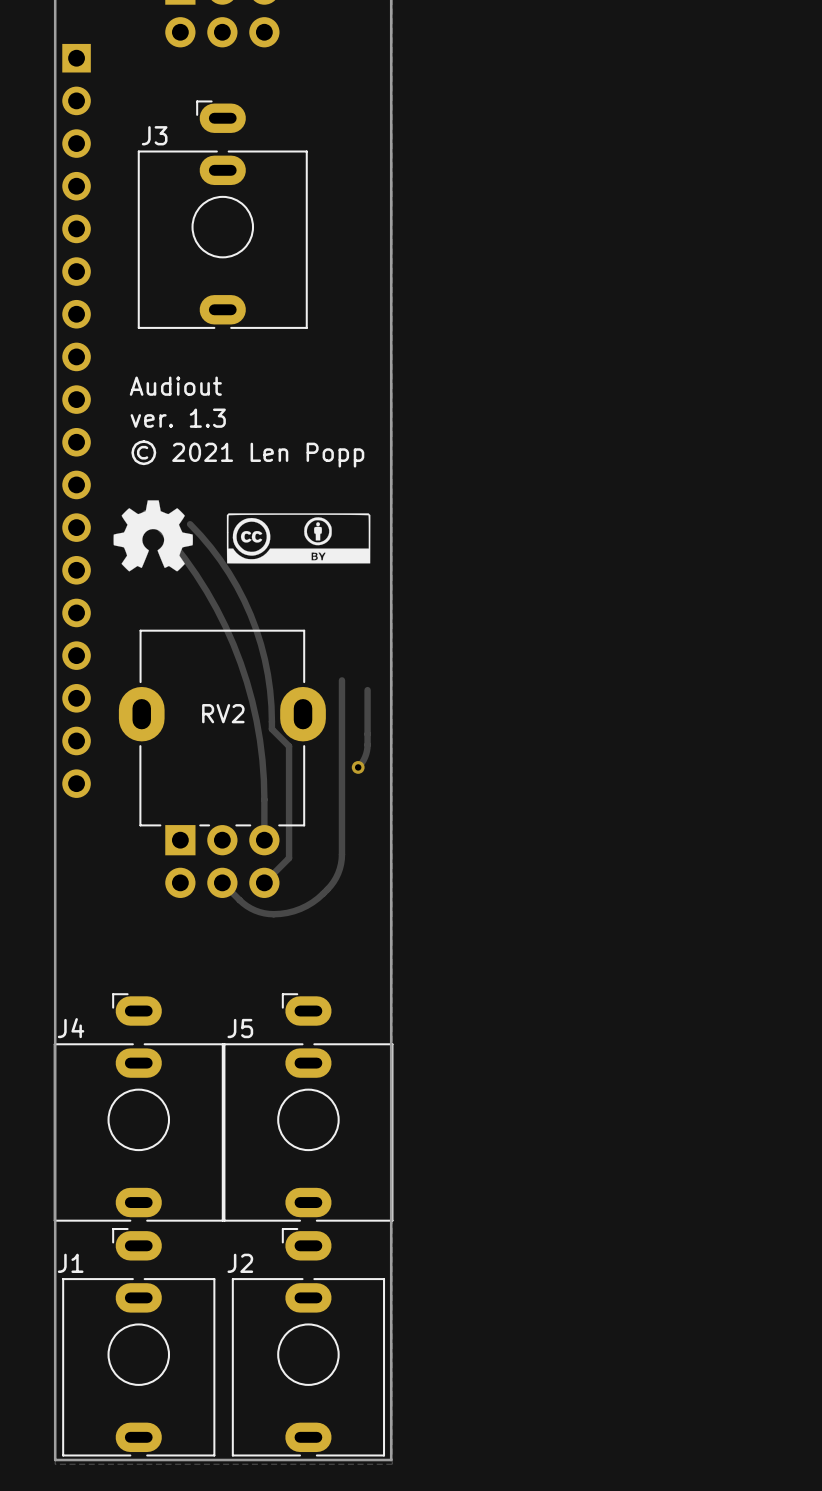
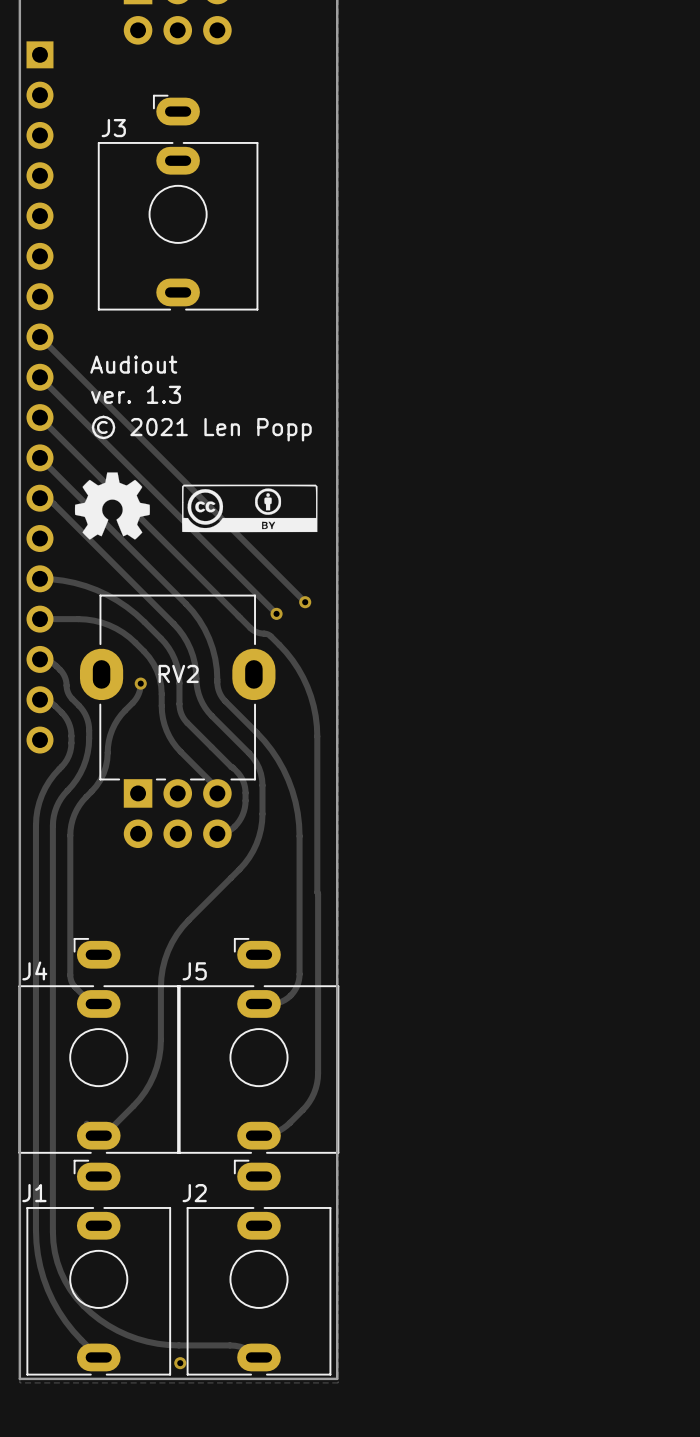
track: none -> (39, 336) (305, 602)
track: none -> (39, 377) (276, 613)
track: none -> (39, 417) (250, 627) (256, 632) (268, 634) (279, 644) (298, 668) (310, 696) (315, 716) (317, 736) (317, 1078) (314, 1093) (309, 1102) (289, 1122) (275, 1132) (259, 1135)
track: none -> (39, 457) (192, 611) (204, 629) (212, 648) (220, 694) (264, 741) (277, 759) (288, 780) (295, 801) (299, 824) (299, 977) (294, 990) (284, 1000) (274, 1003) (259, 1003)
track: (145, 513) (172, 542) (196, 574) (216, 608) (240, 663) (252, 701) (259, 740) (263, 779) (264, 840) -> (39, 619) (94, 620) (116, 628) (135, 642) (149, 657) (157, 671) (161, 686) (162, 718) (169, 736) (180, 751) (214, 786) (217, 793)
track: (190, 524) (220, 560) (237, 586) (250, 614) (260, 644) (267, 674) (271, 729) (289, 746) (289, 858) (264, 882) -> (236, 771) (244, 786) (243, 811) (233, 828) (217, 833)
track: none -> (39, 498) (53, 503) (178, 629) (193, 656) (197, 688) (202, 703) (211, 715) (253, 757) (259, 768) (262, 779) (262, 821) (259, 836) (253, 850) (239, 869) (182, 927) (168, 951) (161, 977) (160, 1049) (156, 1067) (149, 1083) (139, 1099) (104, 1134) (98, 1135) (86, 1123)
track: none -> (39, 578) (74, 582) (96, 590) (126, 607) (144, 622) (165, 643) (174, 659) (179, 677) (179, 709) (183, 718) (234, 769)
via: none -> (305, 602)
via: none -> (276, 613)
track: (341, 680) (341, 854) (336, 877) (323, 893) (306, 905) (294, 911) (273, 914) (259, 912) (246, 906) (222, 882) -> none
track: (367, 690) (367, 747) (363, 759) (358, 767) -> none
track: none -> (39, 659) (51, 662) (62, 672) (65, 679) (68, 692) (85, 713) (89, 730) (87, 752) (83, 766) (76, 779) (58, 802) (53, 821) (52, 1231) (57, 1262) (65, 1281) (76, 1298) (91, 1313) (117, 1330) (137, 1338) (157, 1343) (235, 1345) (250, 1350) (259, 1357)
track: none -> (140, 683) (136, 698) (114, 724) (108, 741) (103, 773) (96, 786) (76, 809) (70, 830) (70, 978) (74, 986) (89, 1001) (98, 1003) (101, 998)
via: none -> (140, 683)
track: none -> (39, 699) (51, 703) (65, 717) (70, 729) (71, 742) (66, 759) (49, 781) (42, 794) (36, 817) (36, 1242) (40, 1266) (52, 1300) (73, 1331) (98, 1357)
via: (358, 767) -> none
via: none -> (180, 1363)

